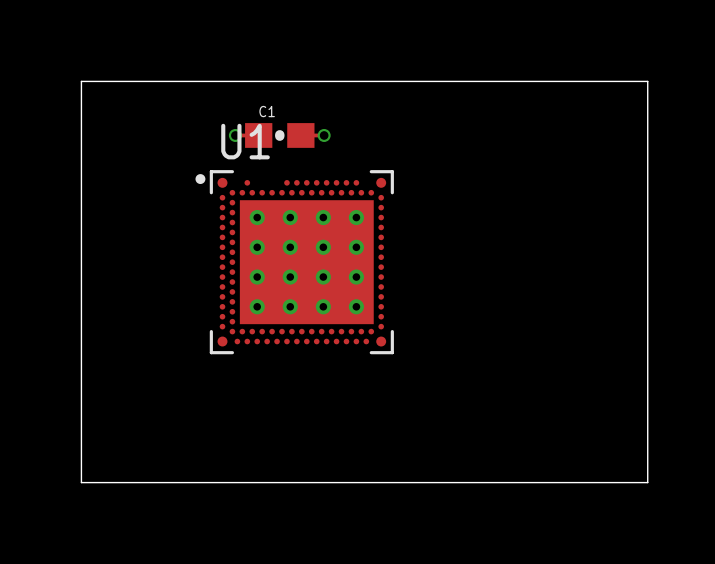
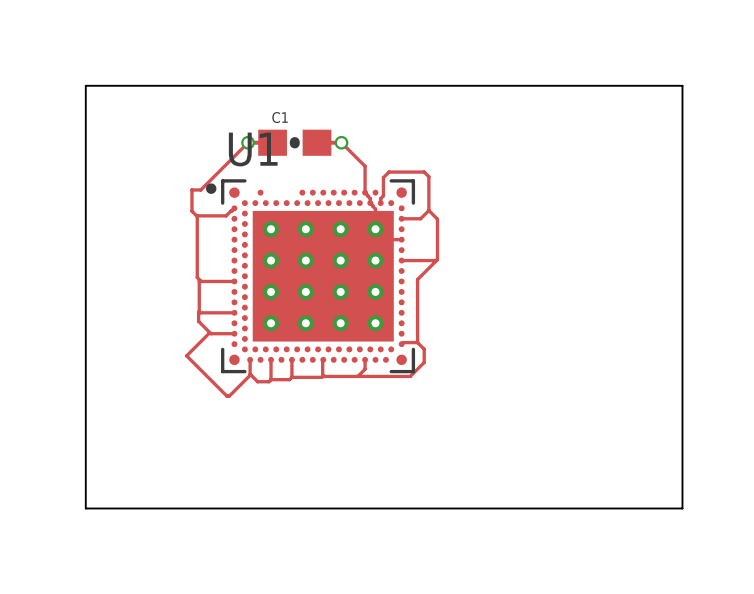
track: none -> (248, 142) (200, 189) (191, 189) (191, 211) (197, 216)
track: none -> (341, 142) (365, 166) (365, 192) (375, 209) (375, 229) (385, 239) (401, 239)
track: none -> (380, 203) (380, 198) (383, 195) (383, 177) (389, 172) (424, 172) (428, 176) (428, 210)
track: none -> (234, 208) (226, 215) (197, 215) (197, 277) (201, 281)
track: none -> (428, 210) (420, 218) (401, 218)
track: none -> (428, 210) (437, 219) (437, 259) (417, 279) (417, 342)
track: none -> (401, 260) (436, 260)
track: none -> (234, 281) (199, 280) (199, 312)
track: none -> (234, 312) (198, 312) (198, 321) (210, 333) (234, 333)
track: none -> (209, 332) (186, 355) (226, 396) (229, 396) (250, 374)
track: none -> (417, 342) (424, 349) (424, 362) (410, 376) (324, 376) (323, 359)
track: none -> (417, 342) (401, 344)
track: none -> (250, 359) (250, 374) (257, 381) (268, 381) (271, 379)
track: none -> (271, 359) (271, 379)
track: none -> (291, 359) (291, 377)
track: none -> (365, 359) (365, 369) (357, 376)
track: none -> (323, 375) (291, 377)
track: none -> (291, 377) (289, 379) (271, 379)

